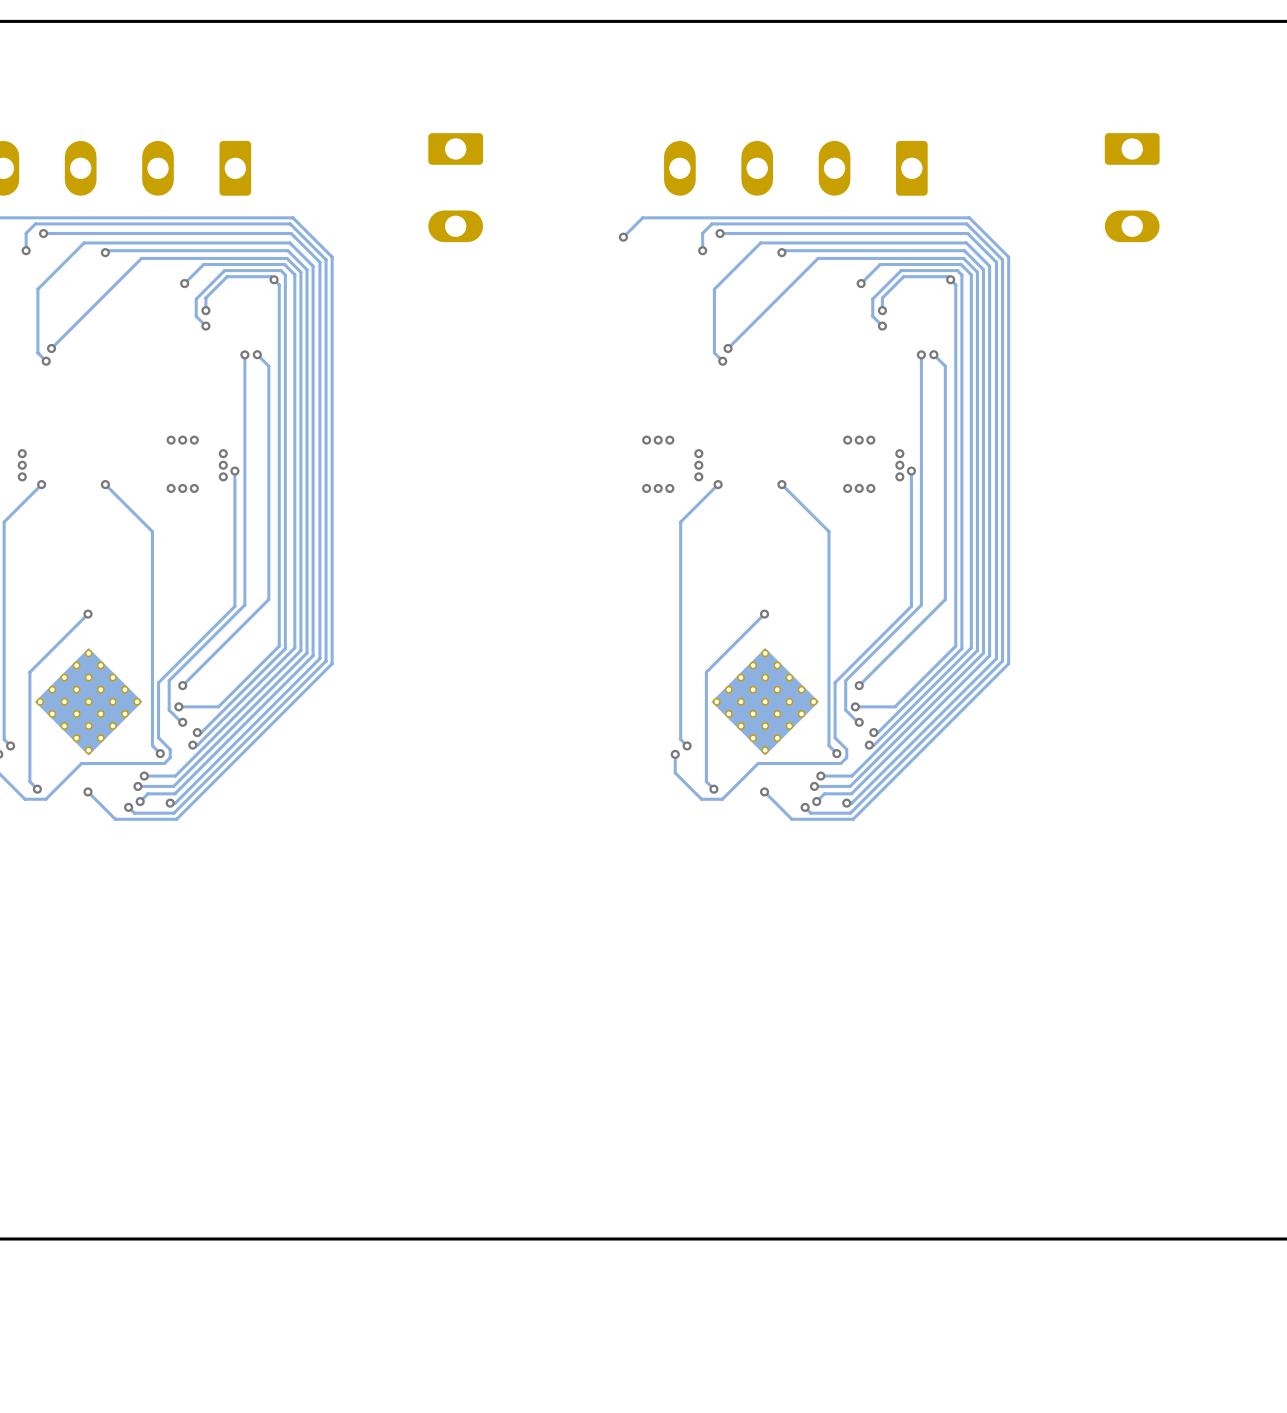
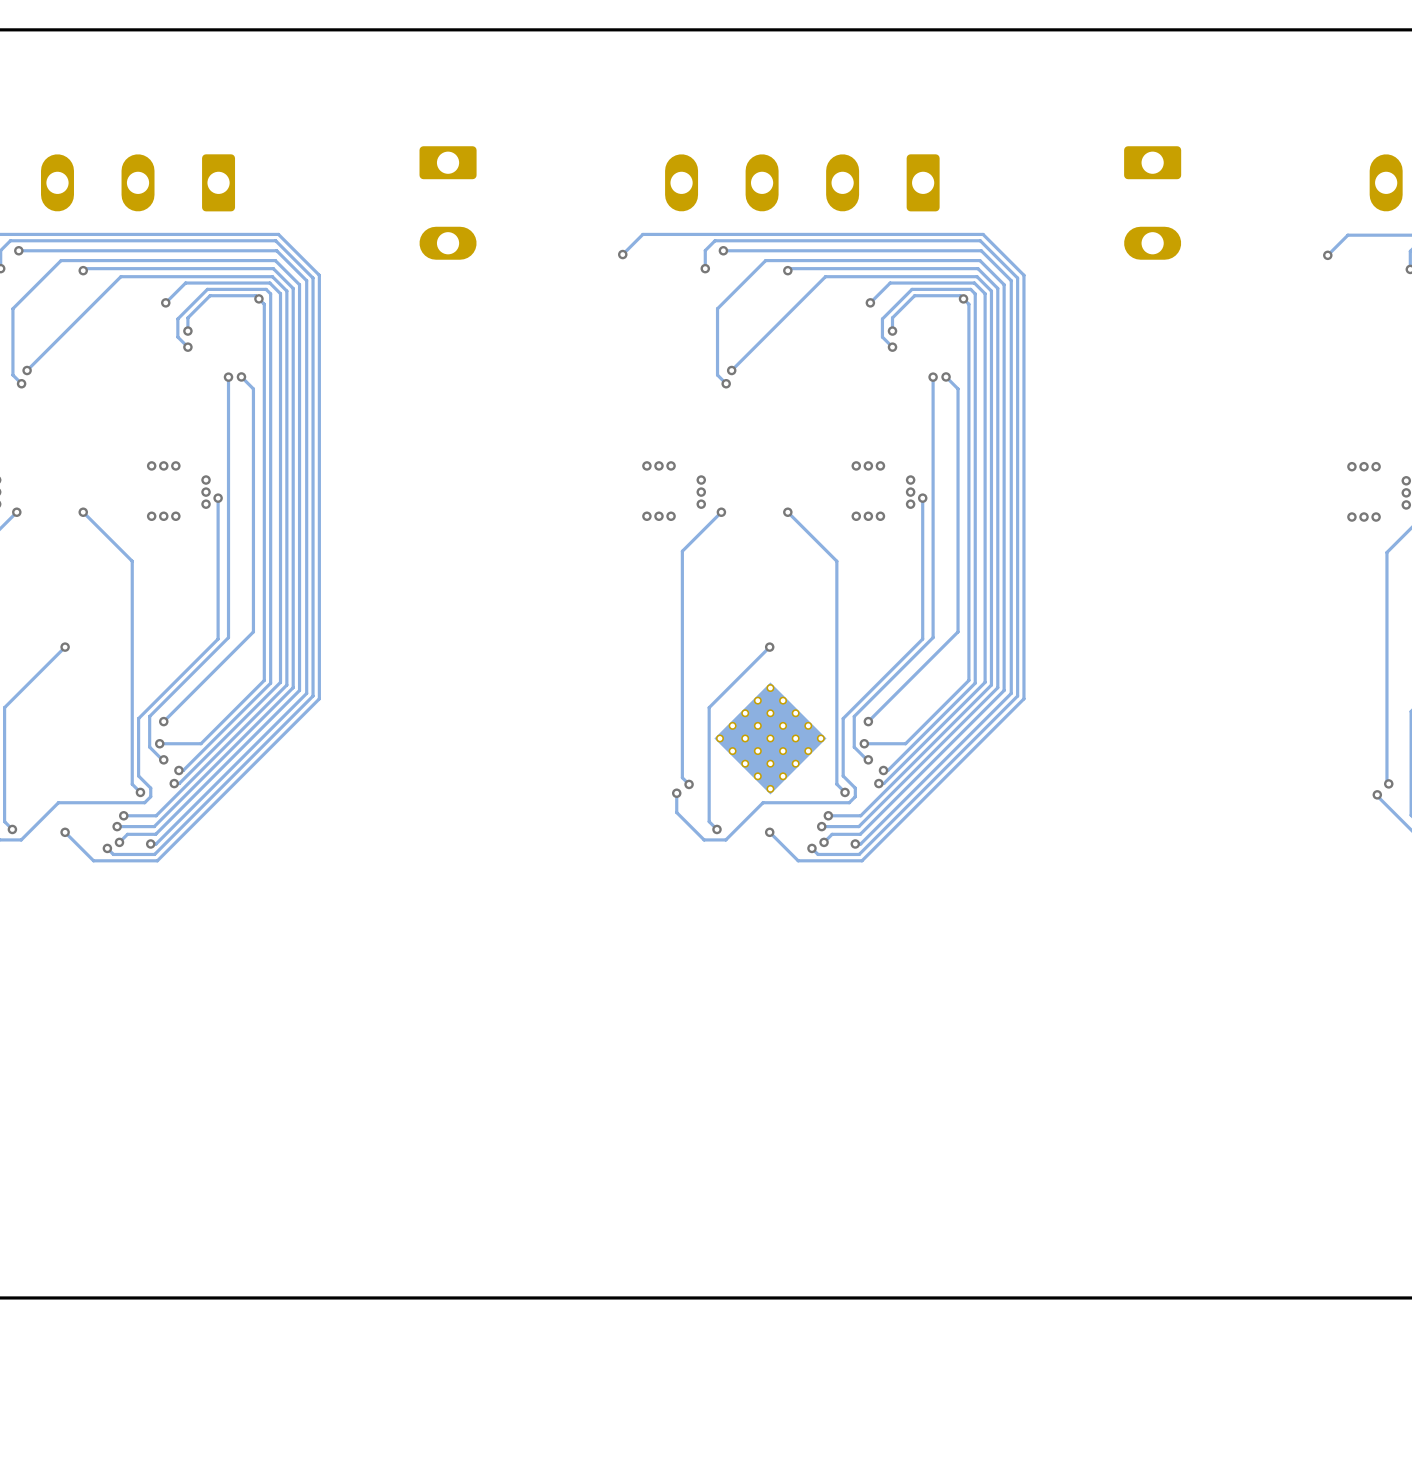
part: (88, 701) -> none

